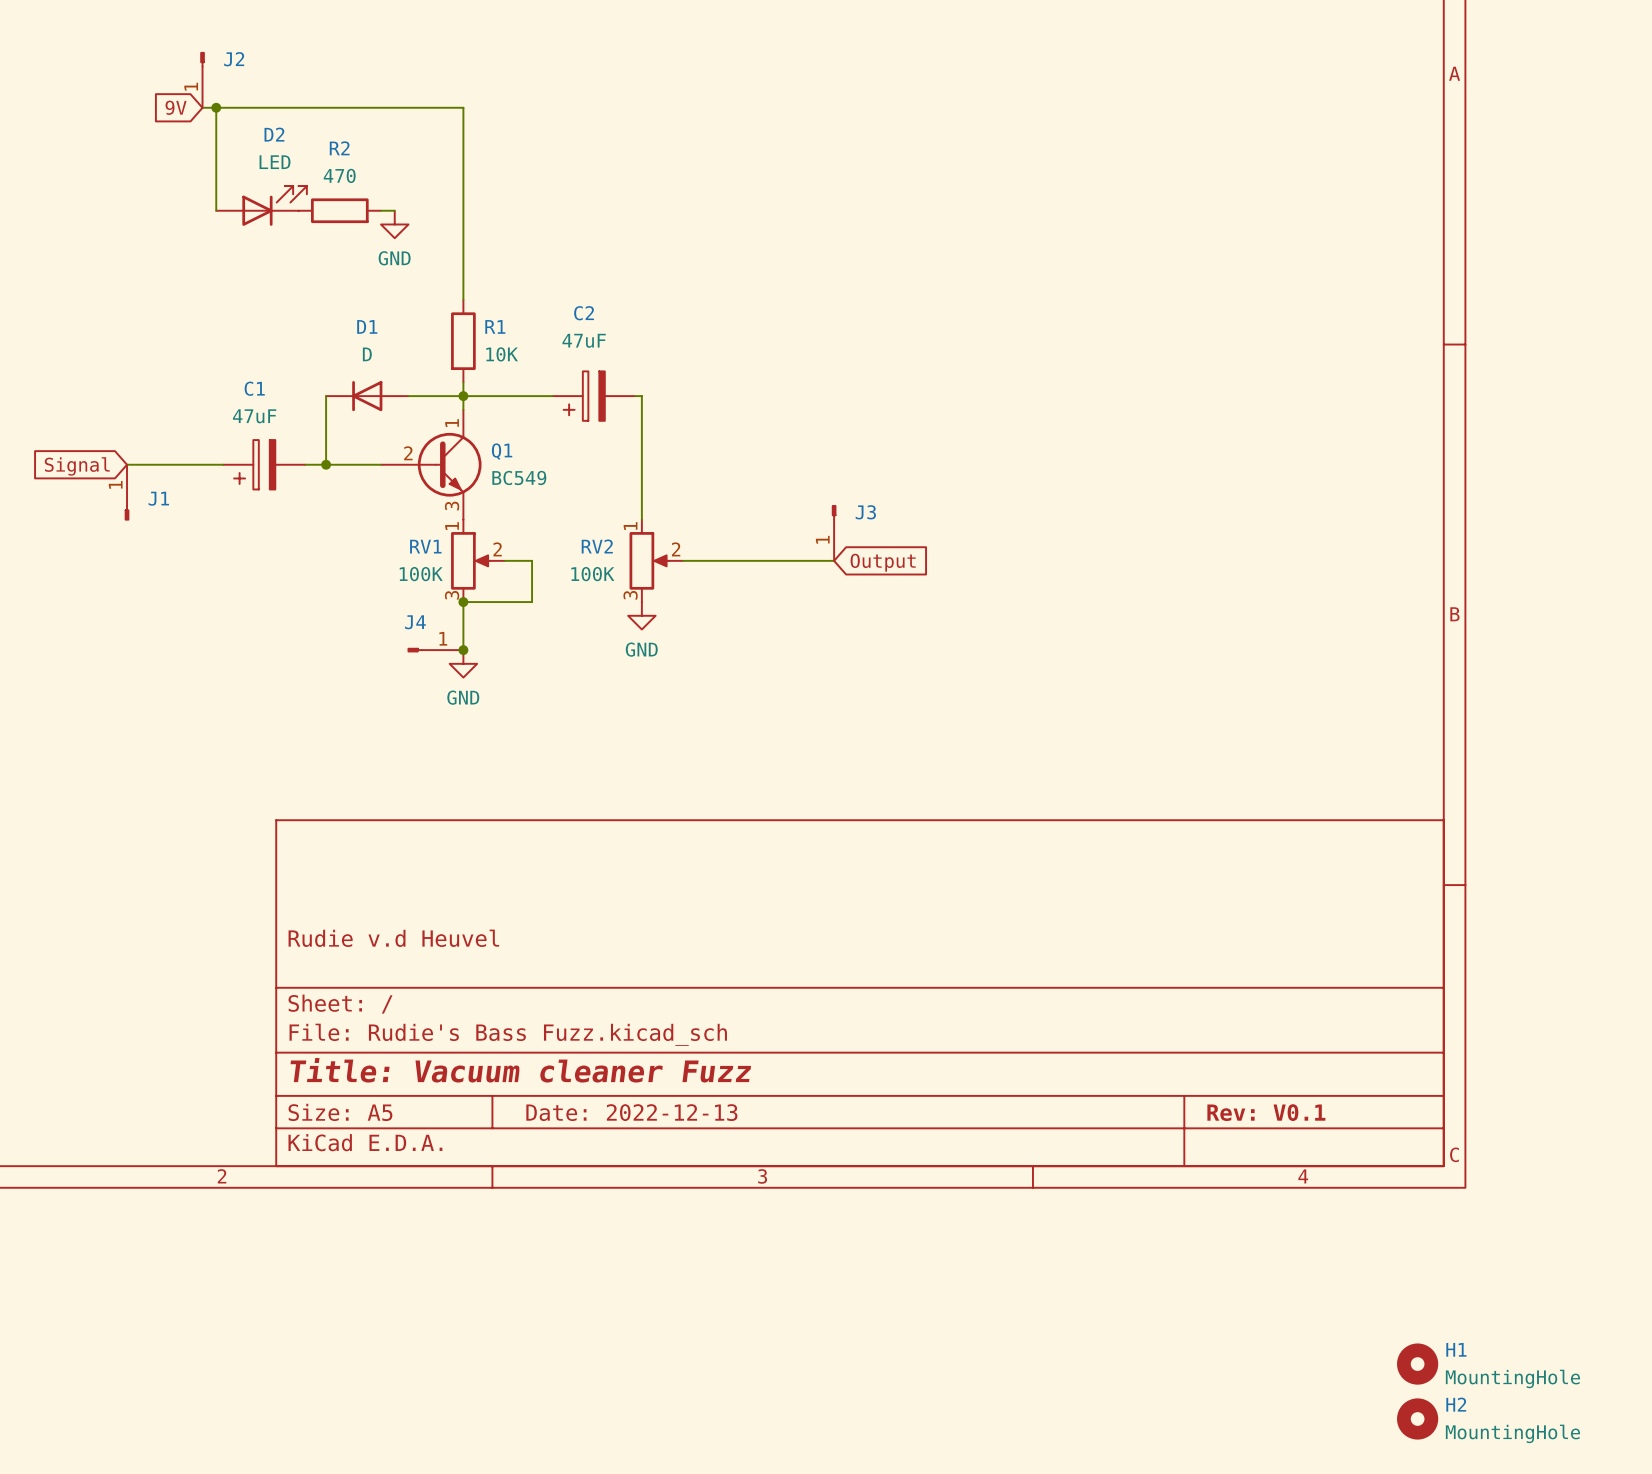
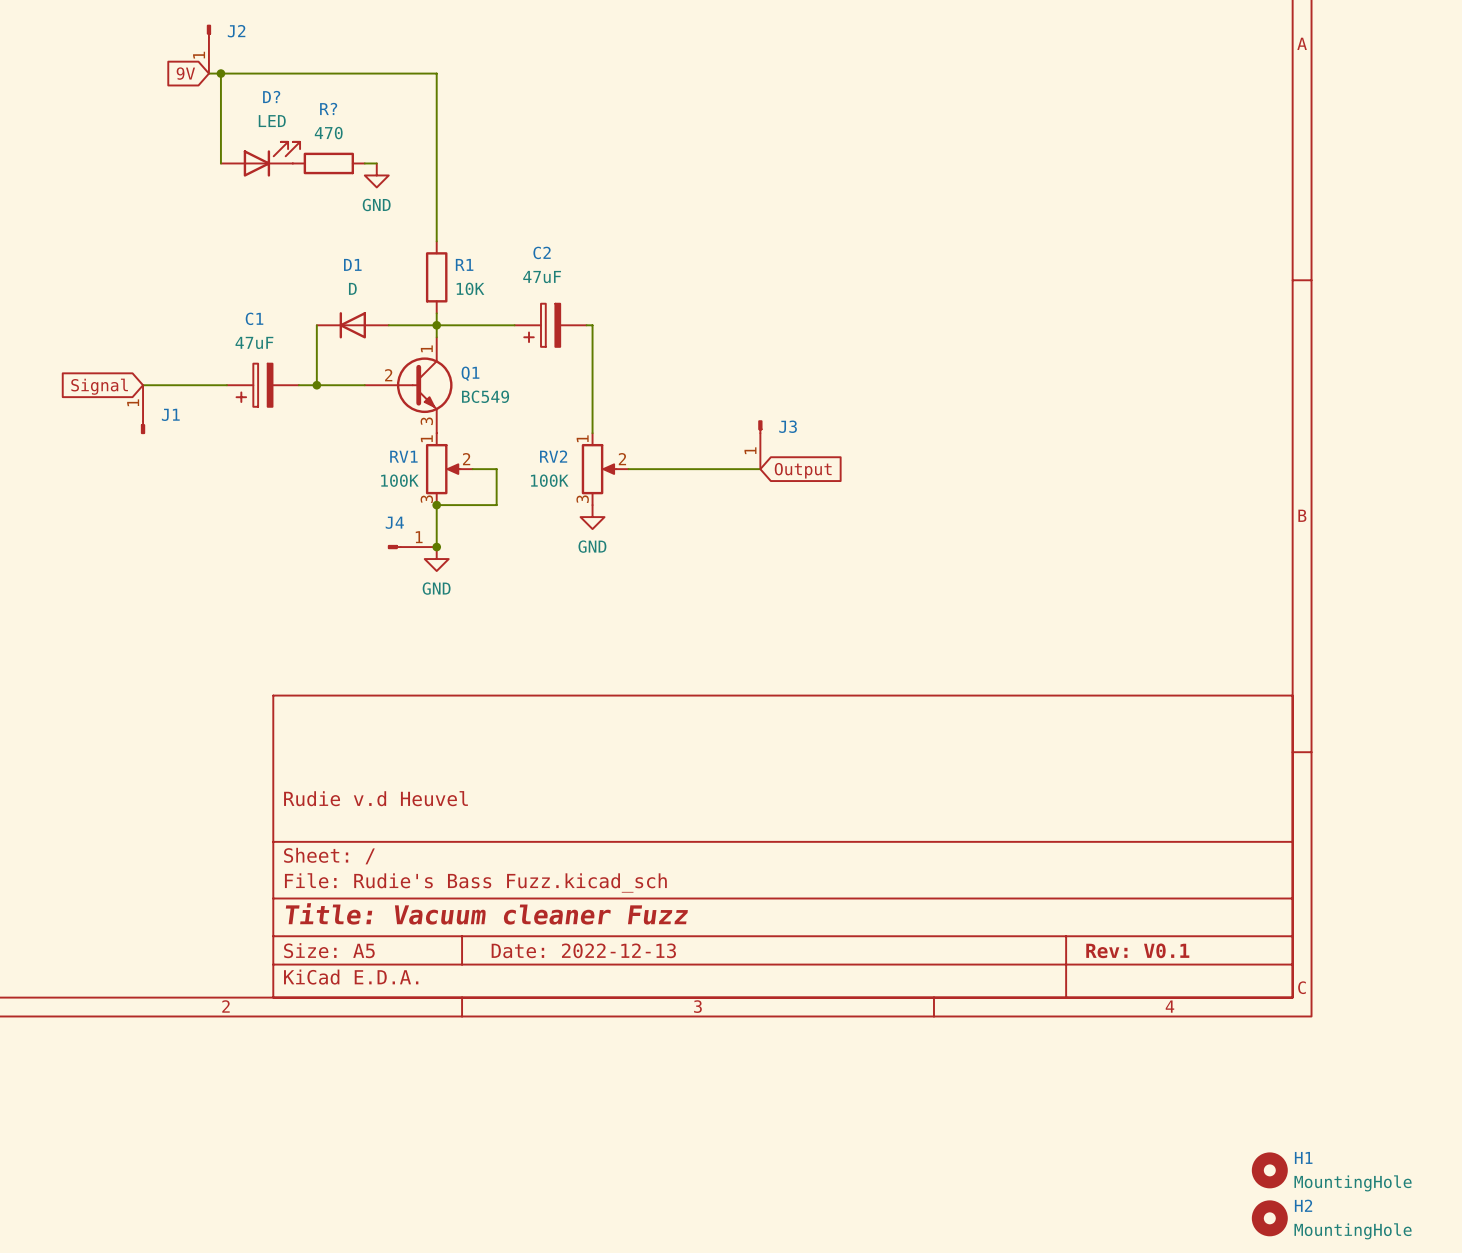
D2 name: D2 (274, 134) -> D? (271, 96)
R2 name: R2 (339, 148) -> R? (328, 108)

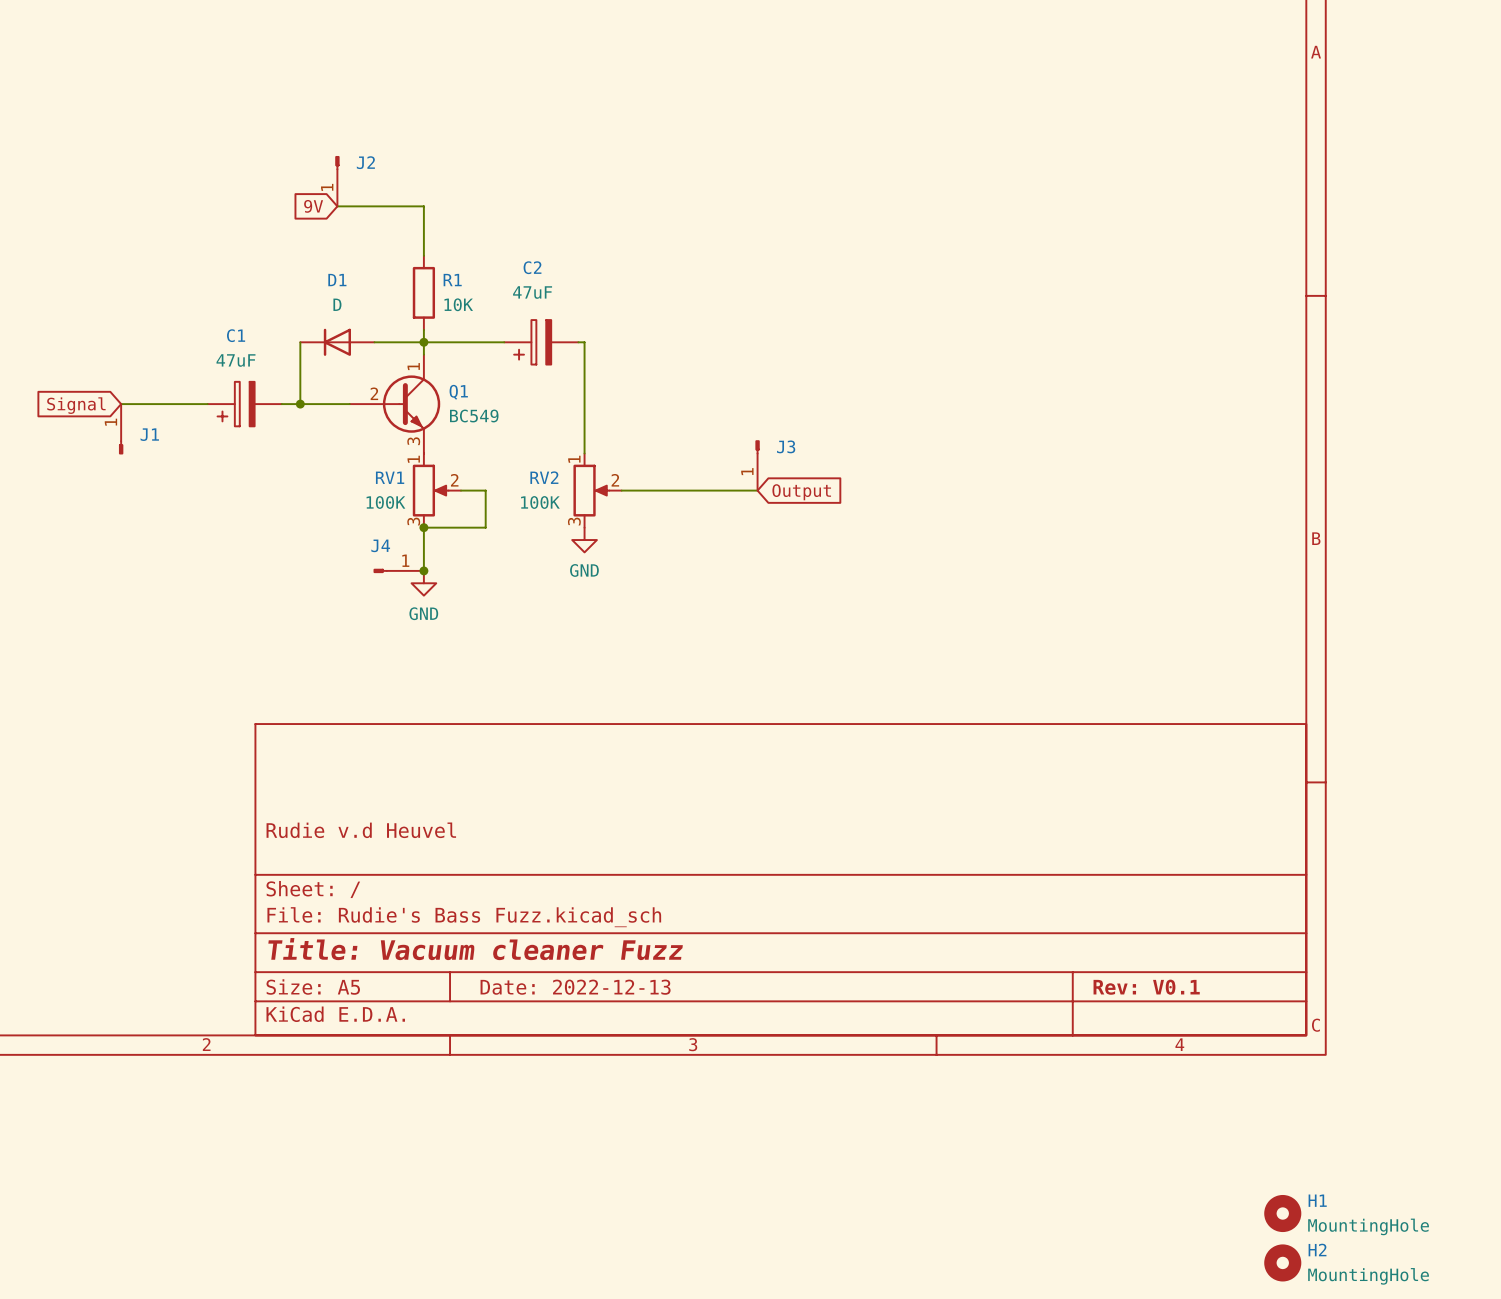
J2 position: (208, 49) -> (337, 181)
global label position: 9V (185, 73) -> 9V (313, 206)
wire: (208, 73) (436, 73) (436, 193) -> (337, 206) (423, 206)
wire: (220, 73) (220, 163) -> none
junction: (220, 73) -> none
D?: LED (260, 159) -> none
R?: 470 (328, 163) -> none
wire: (364, 163) (376, 163) -> none
power symbol: GND (376, 175) -> none

